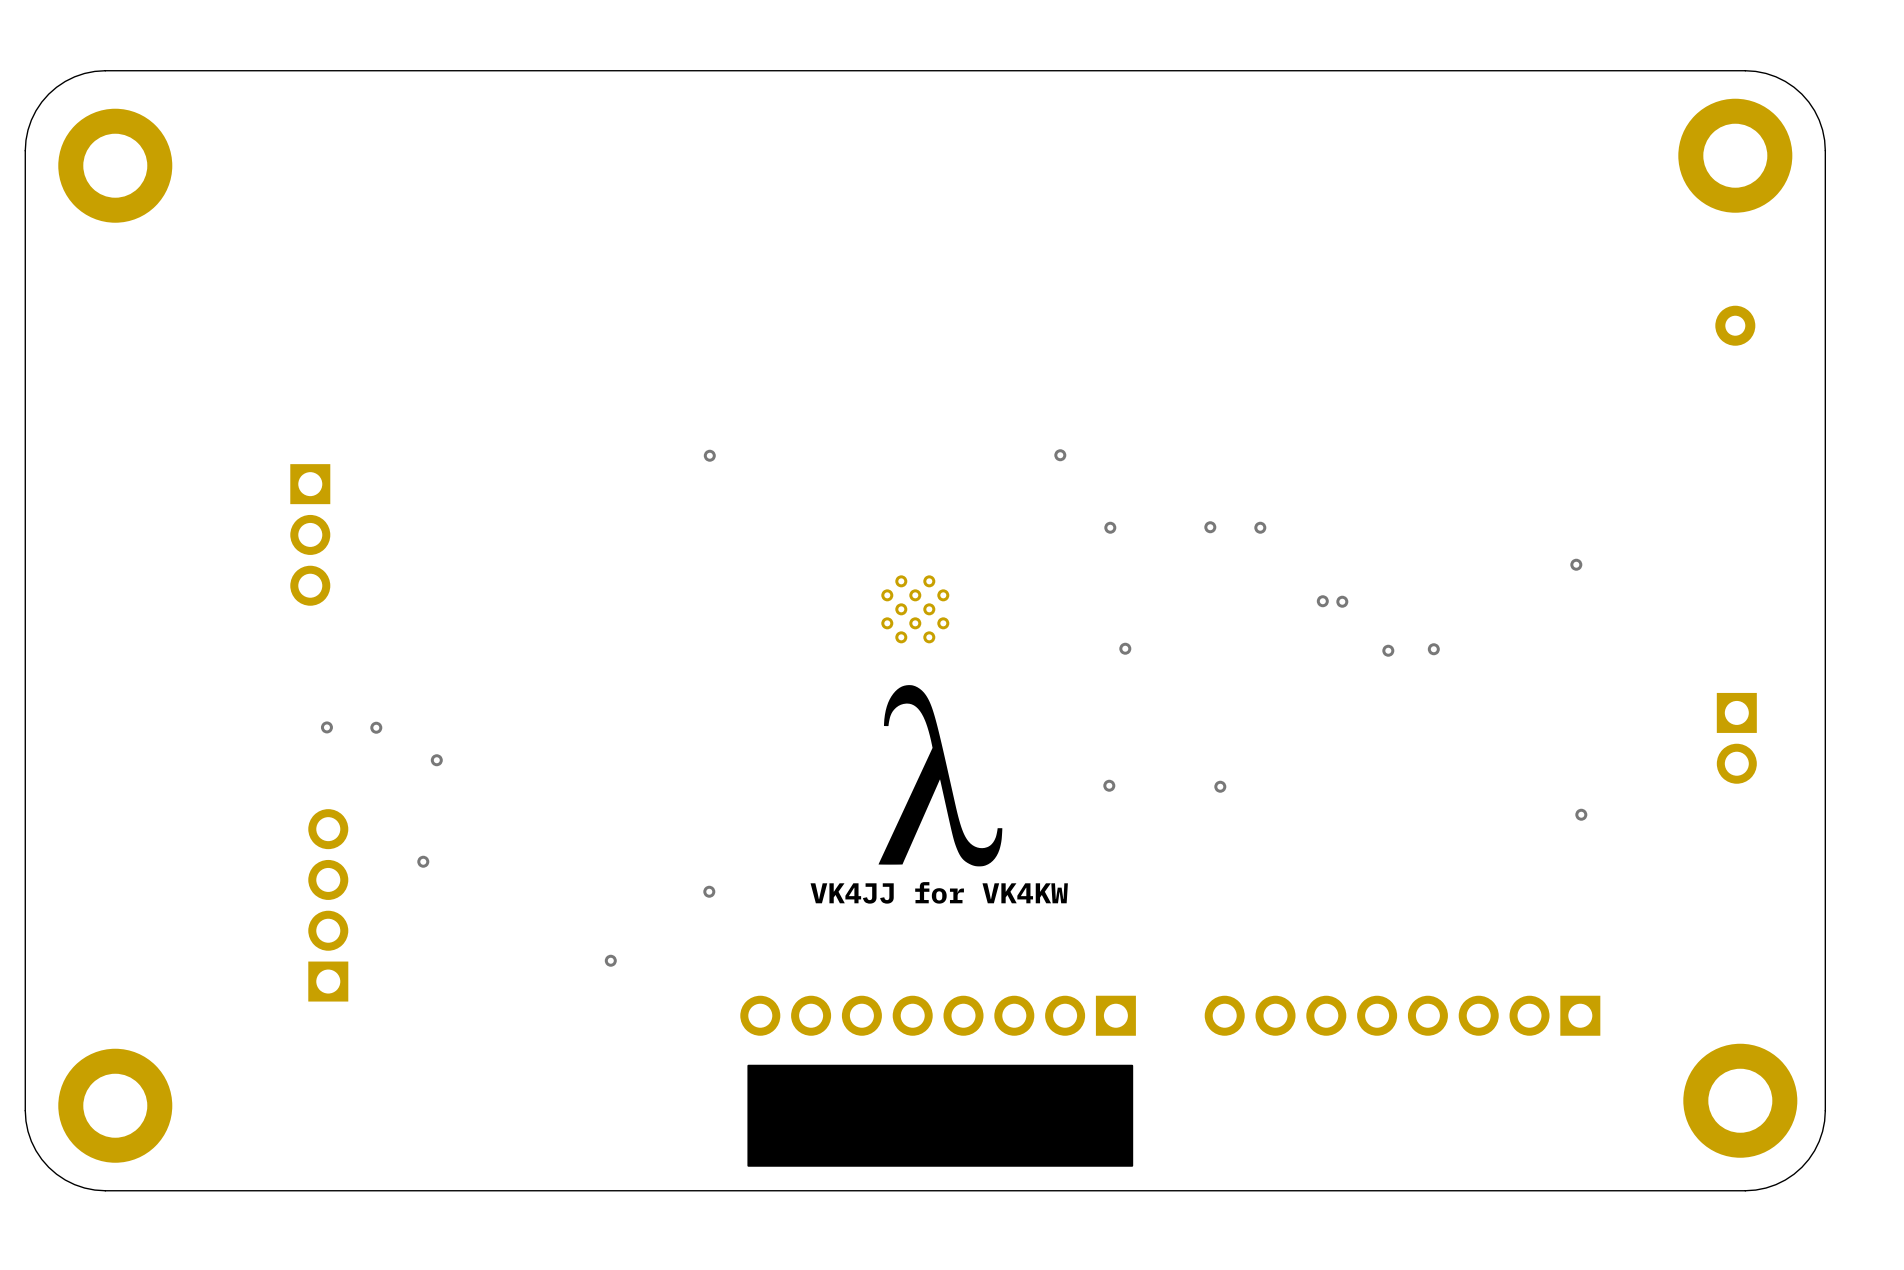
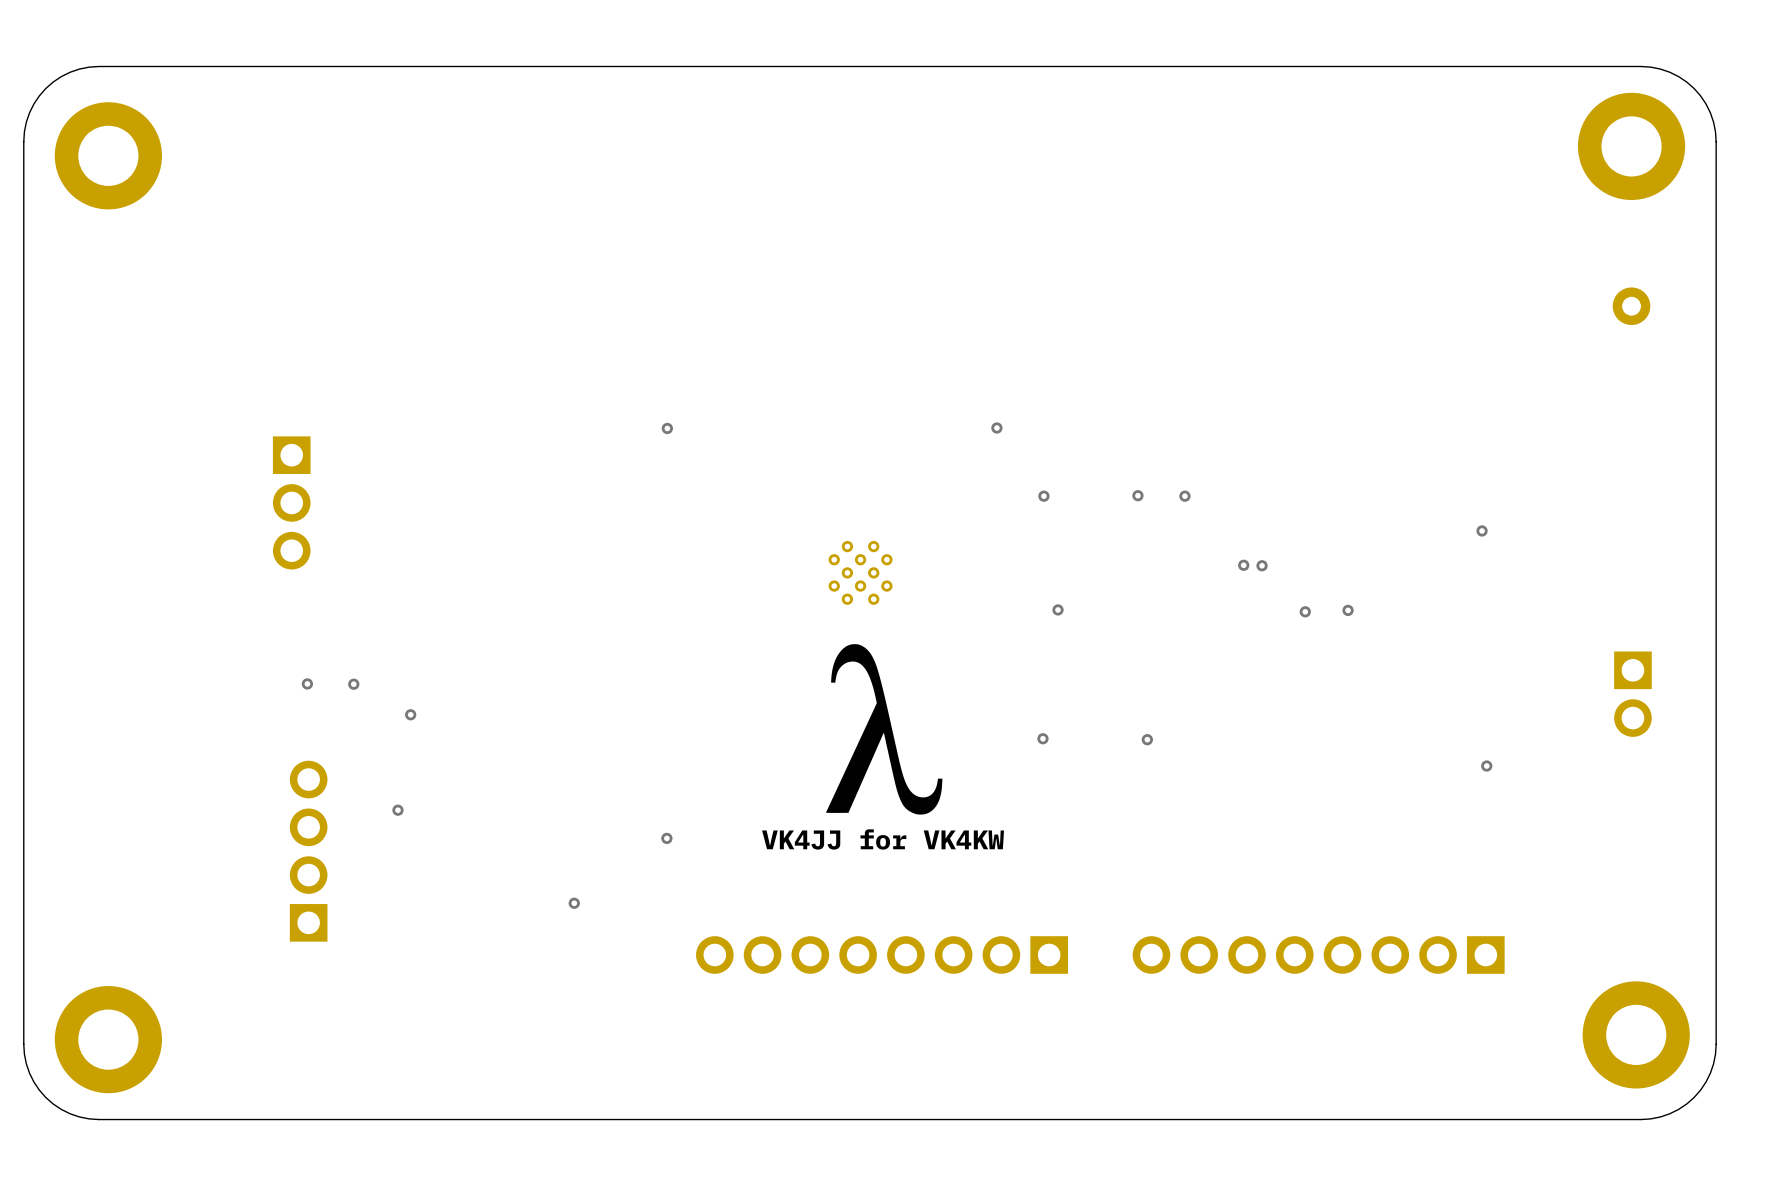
drawing: [747, 1064, 1134, 1167] -> none

